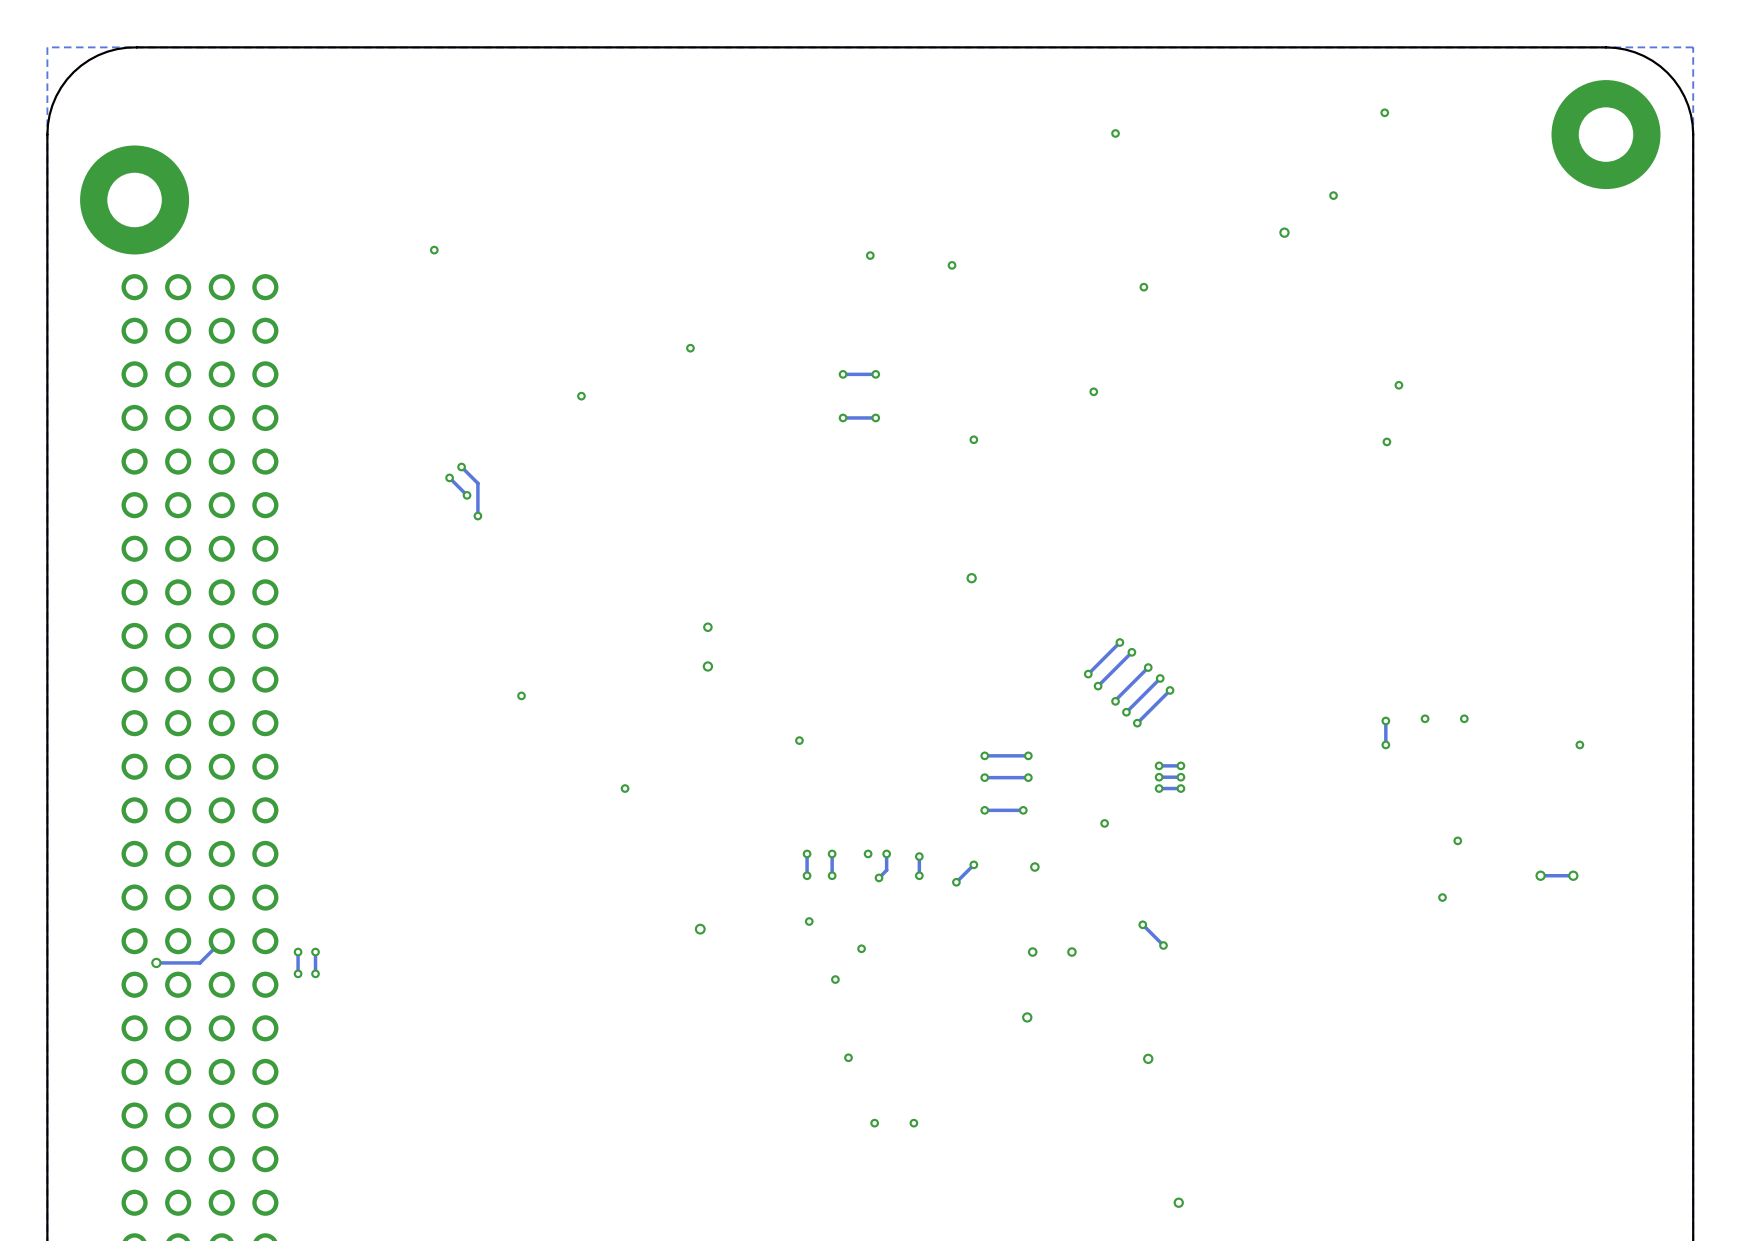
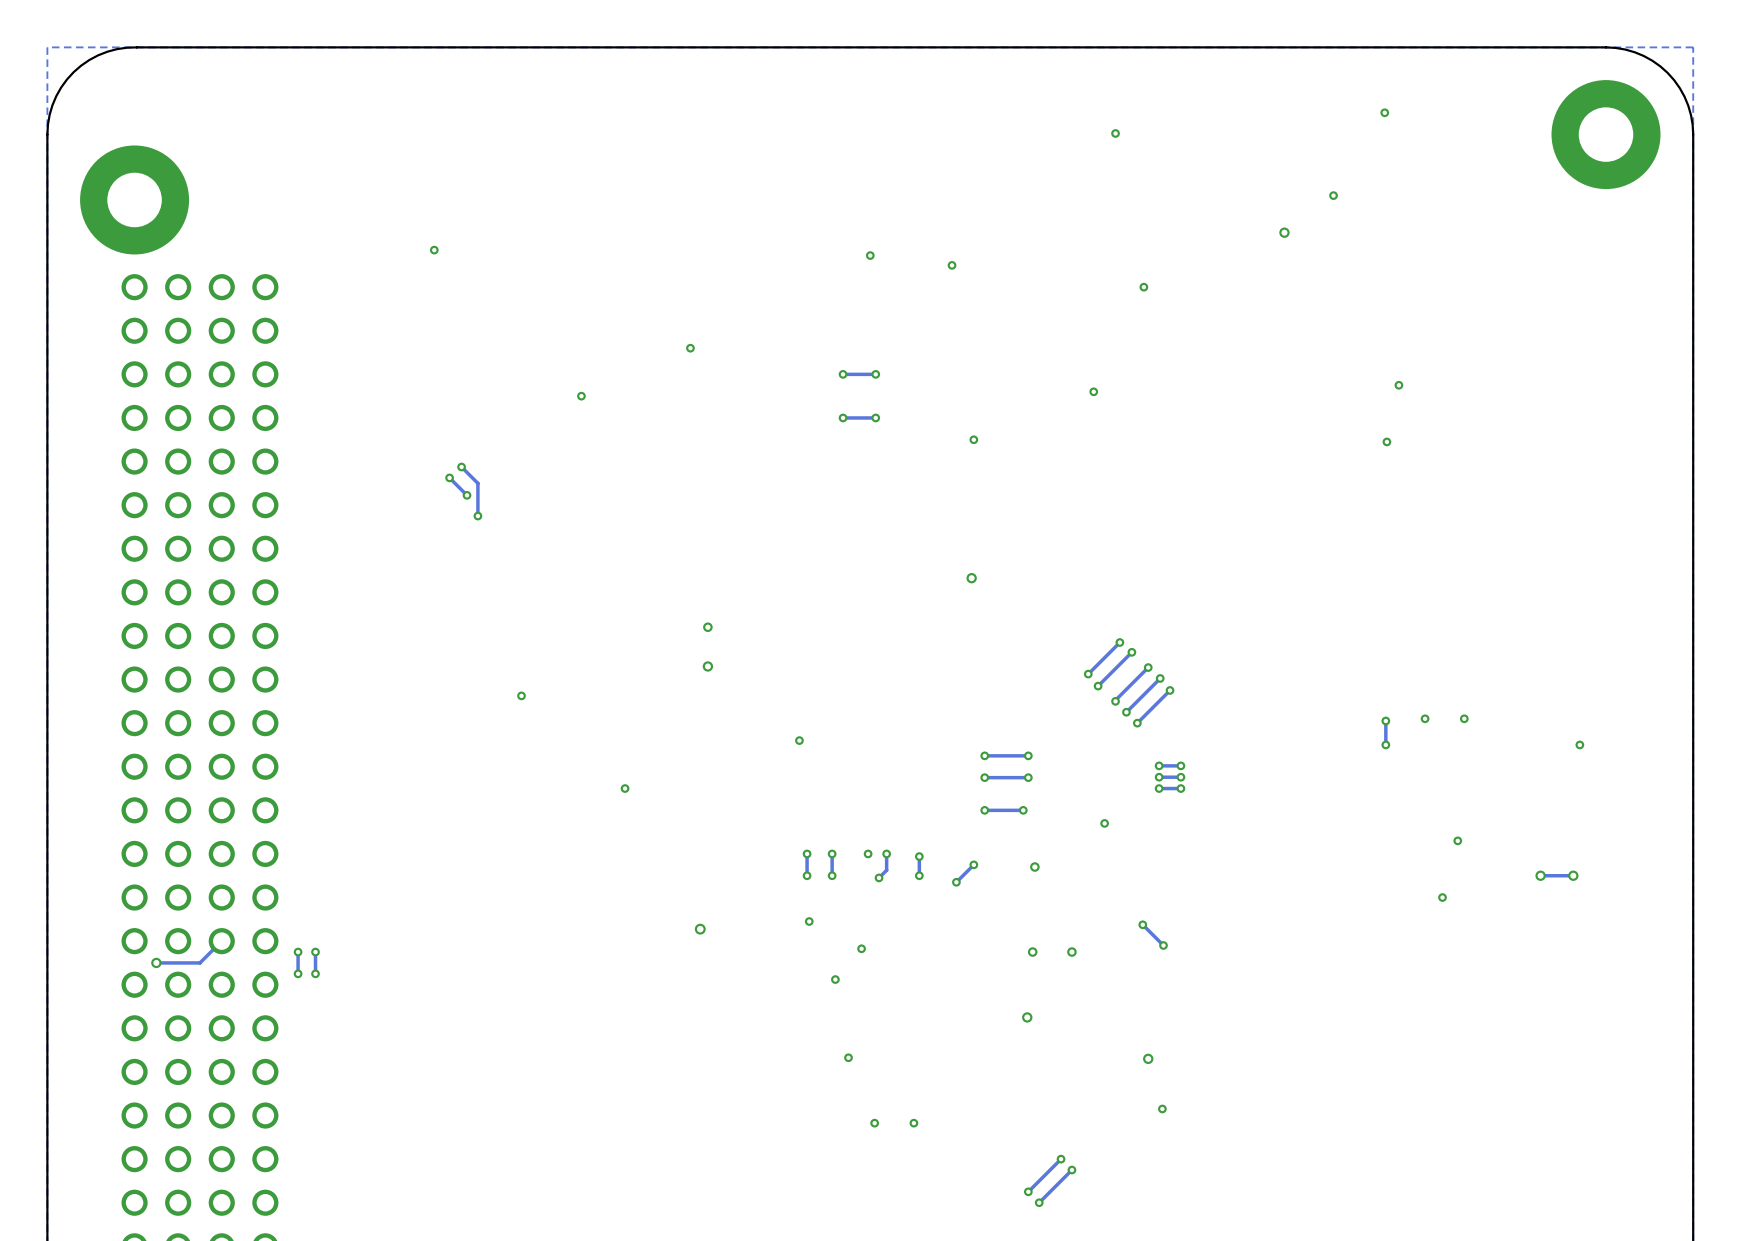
via: none -> (1162, 1108)
track: none -> (1061, 1159) (1028, 1191)
via: none -> (1061, 1159)
track: none -> (1071, 1170) (1039, 1202)
via: none -> (1071, 1170)
via: none -> (1028, 1191)
via: none -> (1039, 1202)
via: (1178, 1202) -> none

